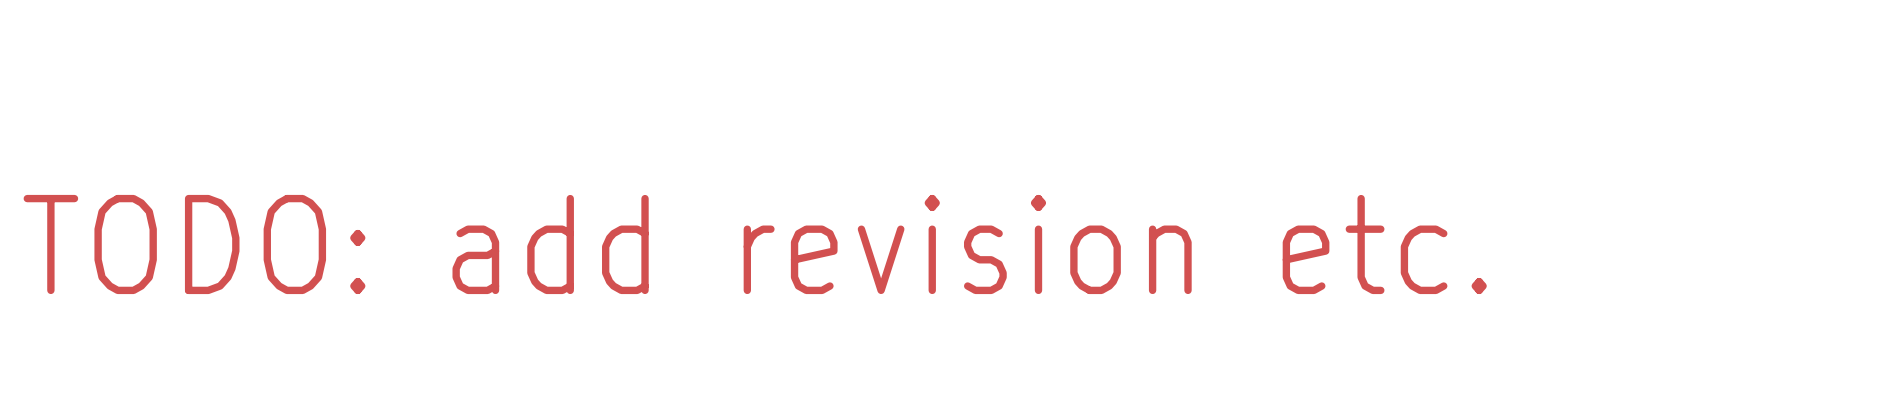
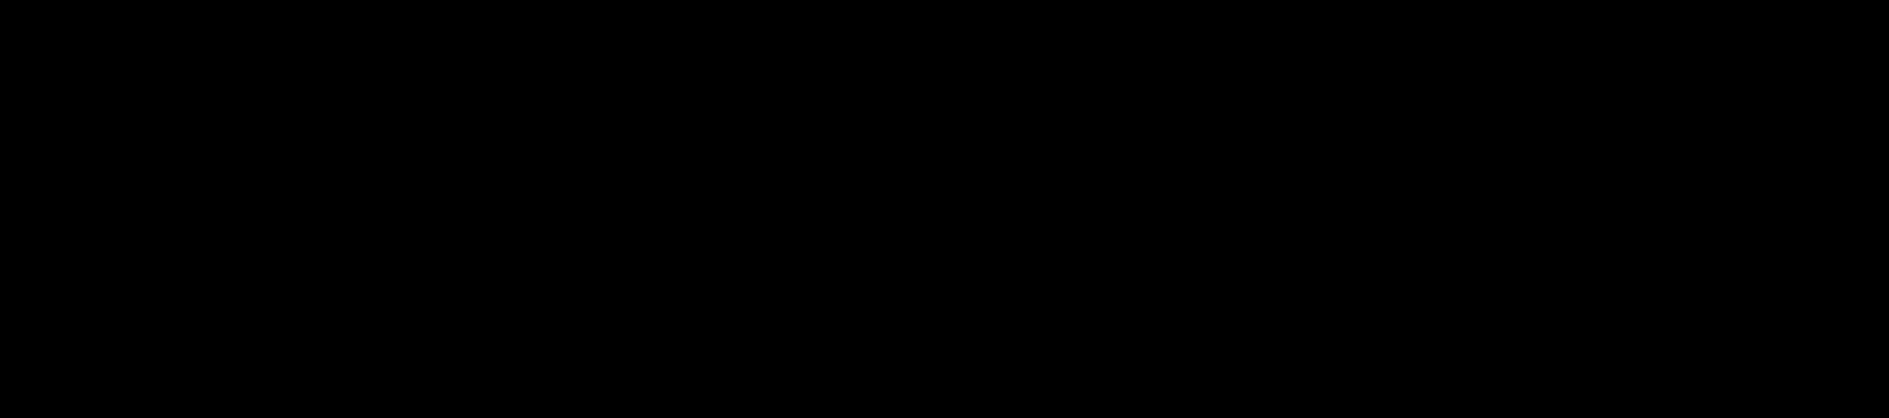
text: TODO: add revision etc. (755, 244) -> none

